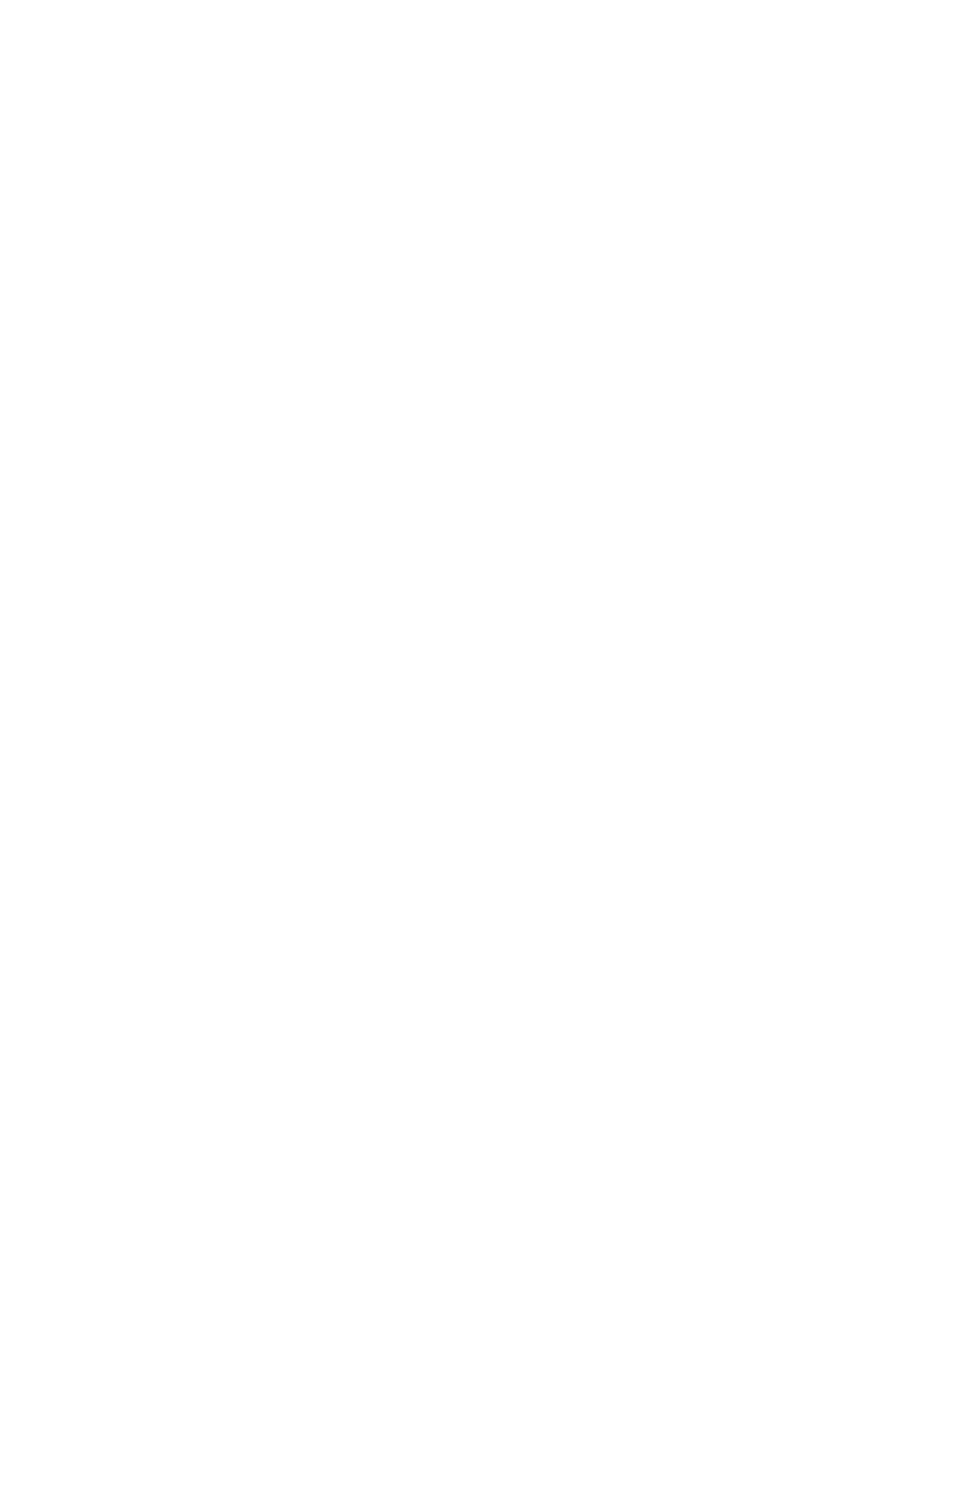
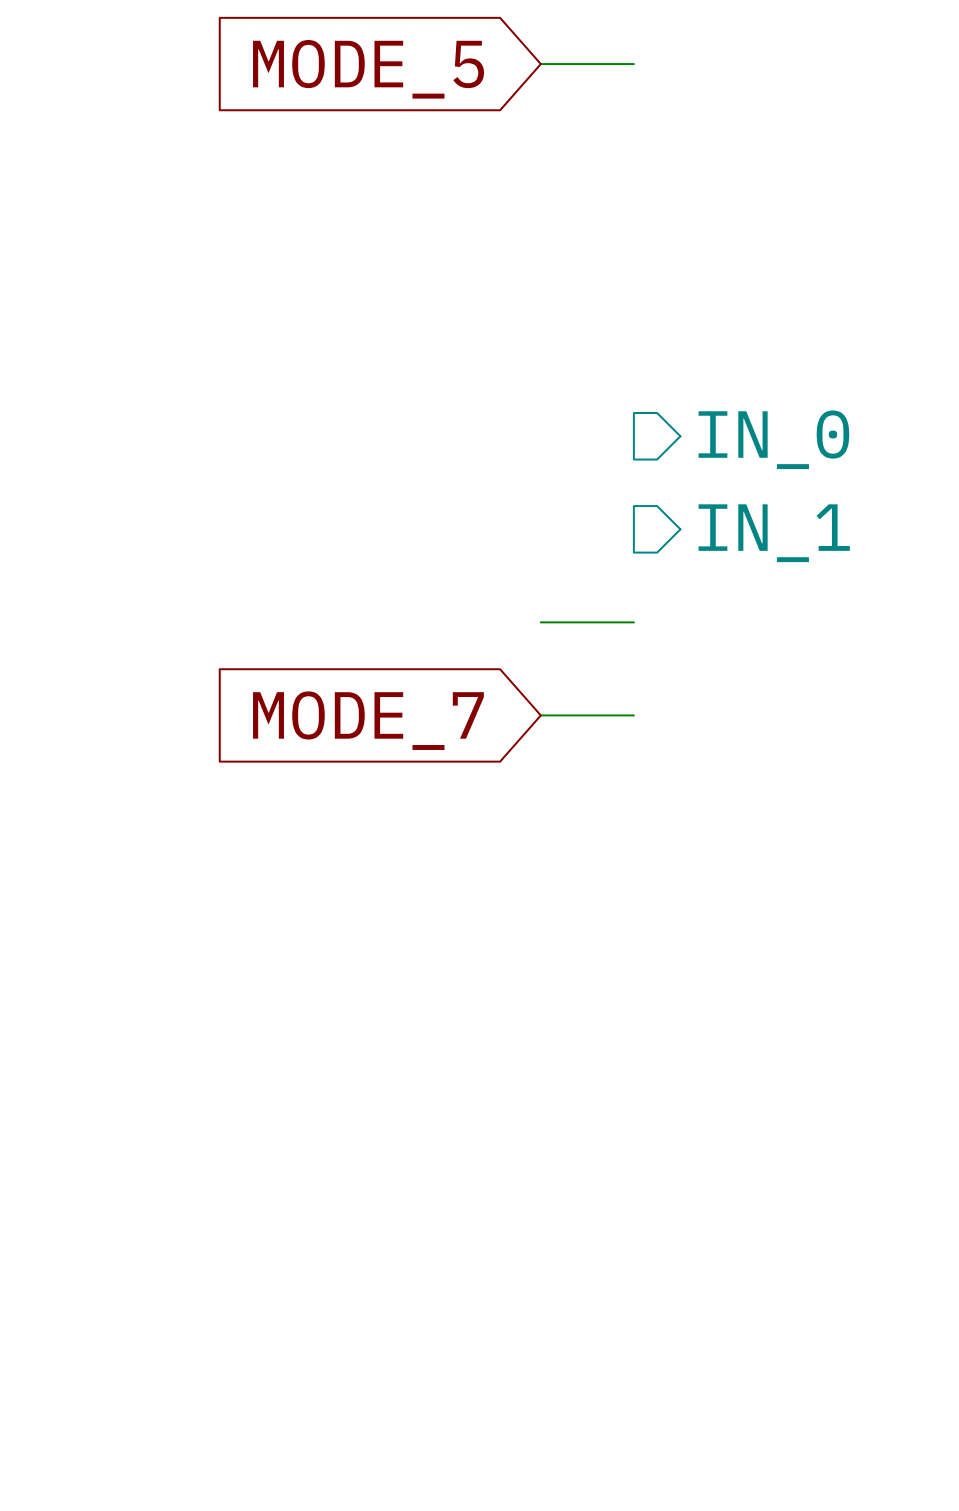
wire: none -> (540, 64) (633, 64)
global label: none -> MODE_5 (368, 69)
sheet pin: none -> IN_0 (773, 439)
sheet pin: none -> IN_1 (774, 533)
wire: none -> (540, 622) (633, 622)
wire: none -> (540, 715) (633, 715)
global label: none -> MODE_7 (368, 720)

